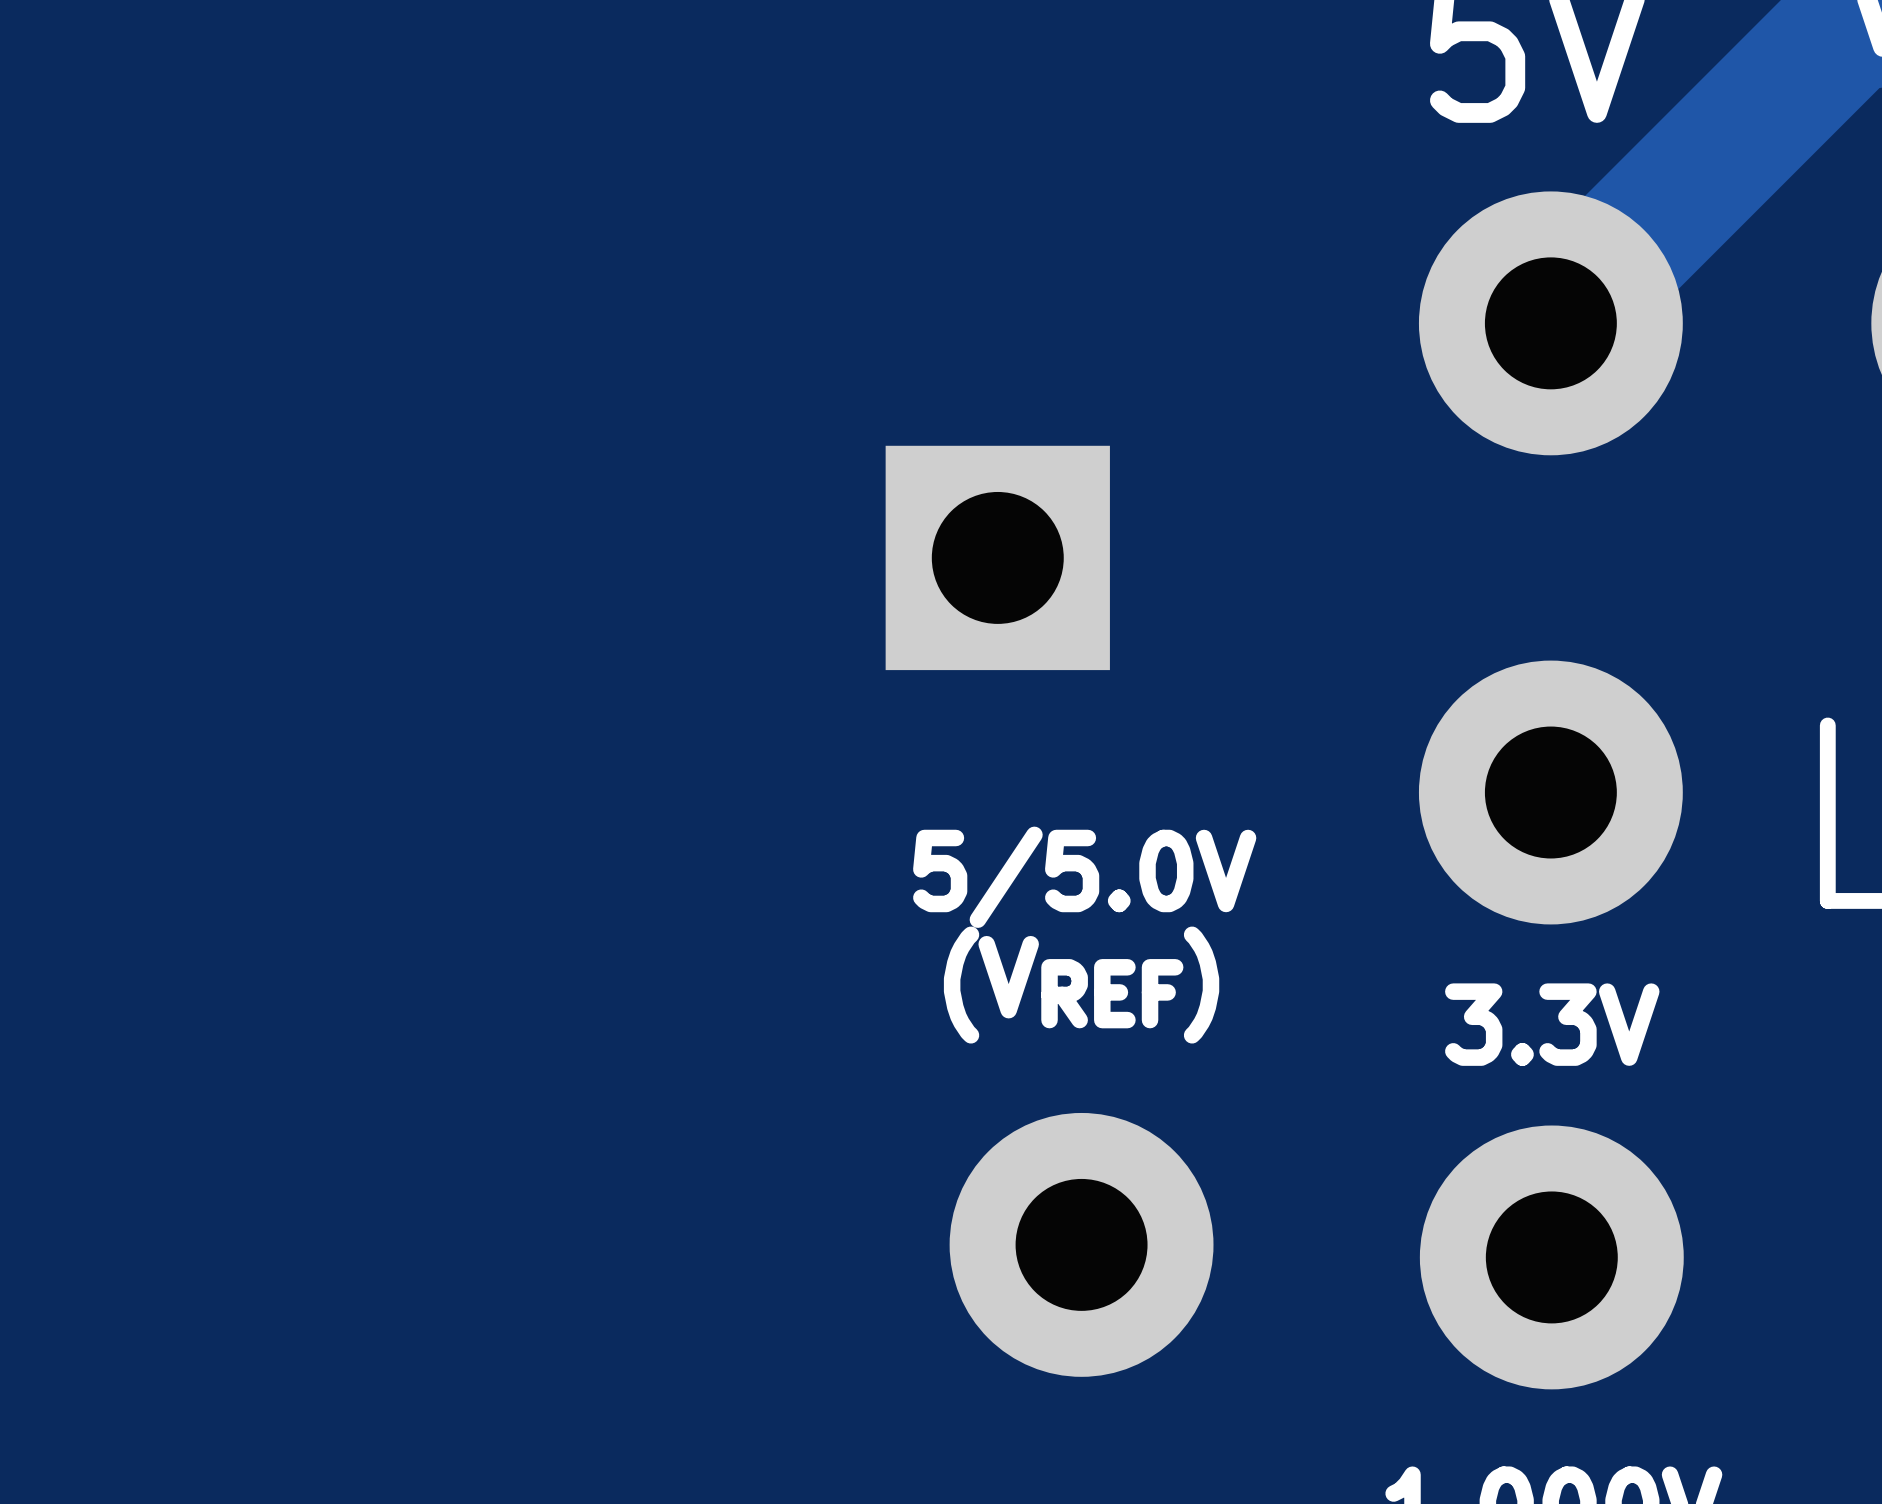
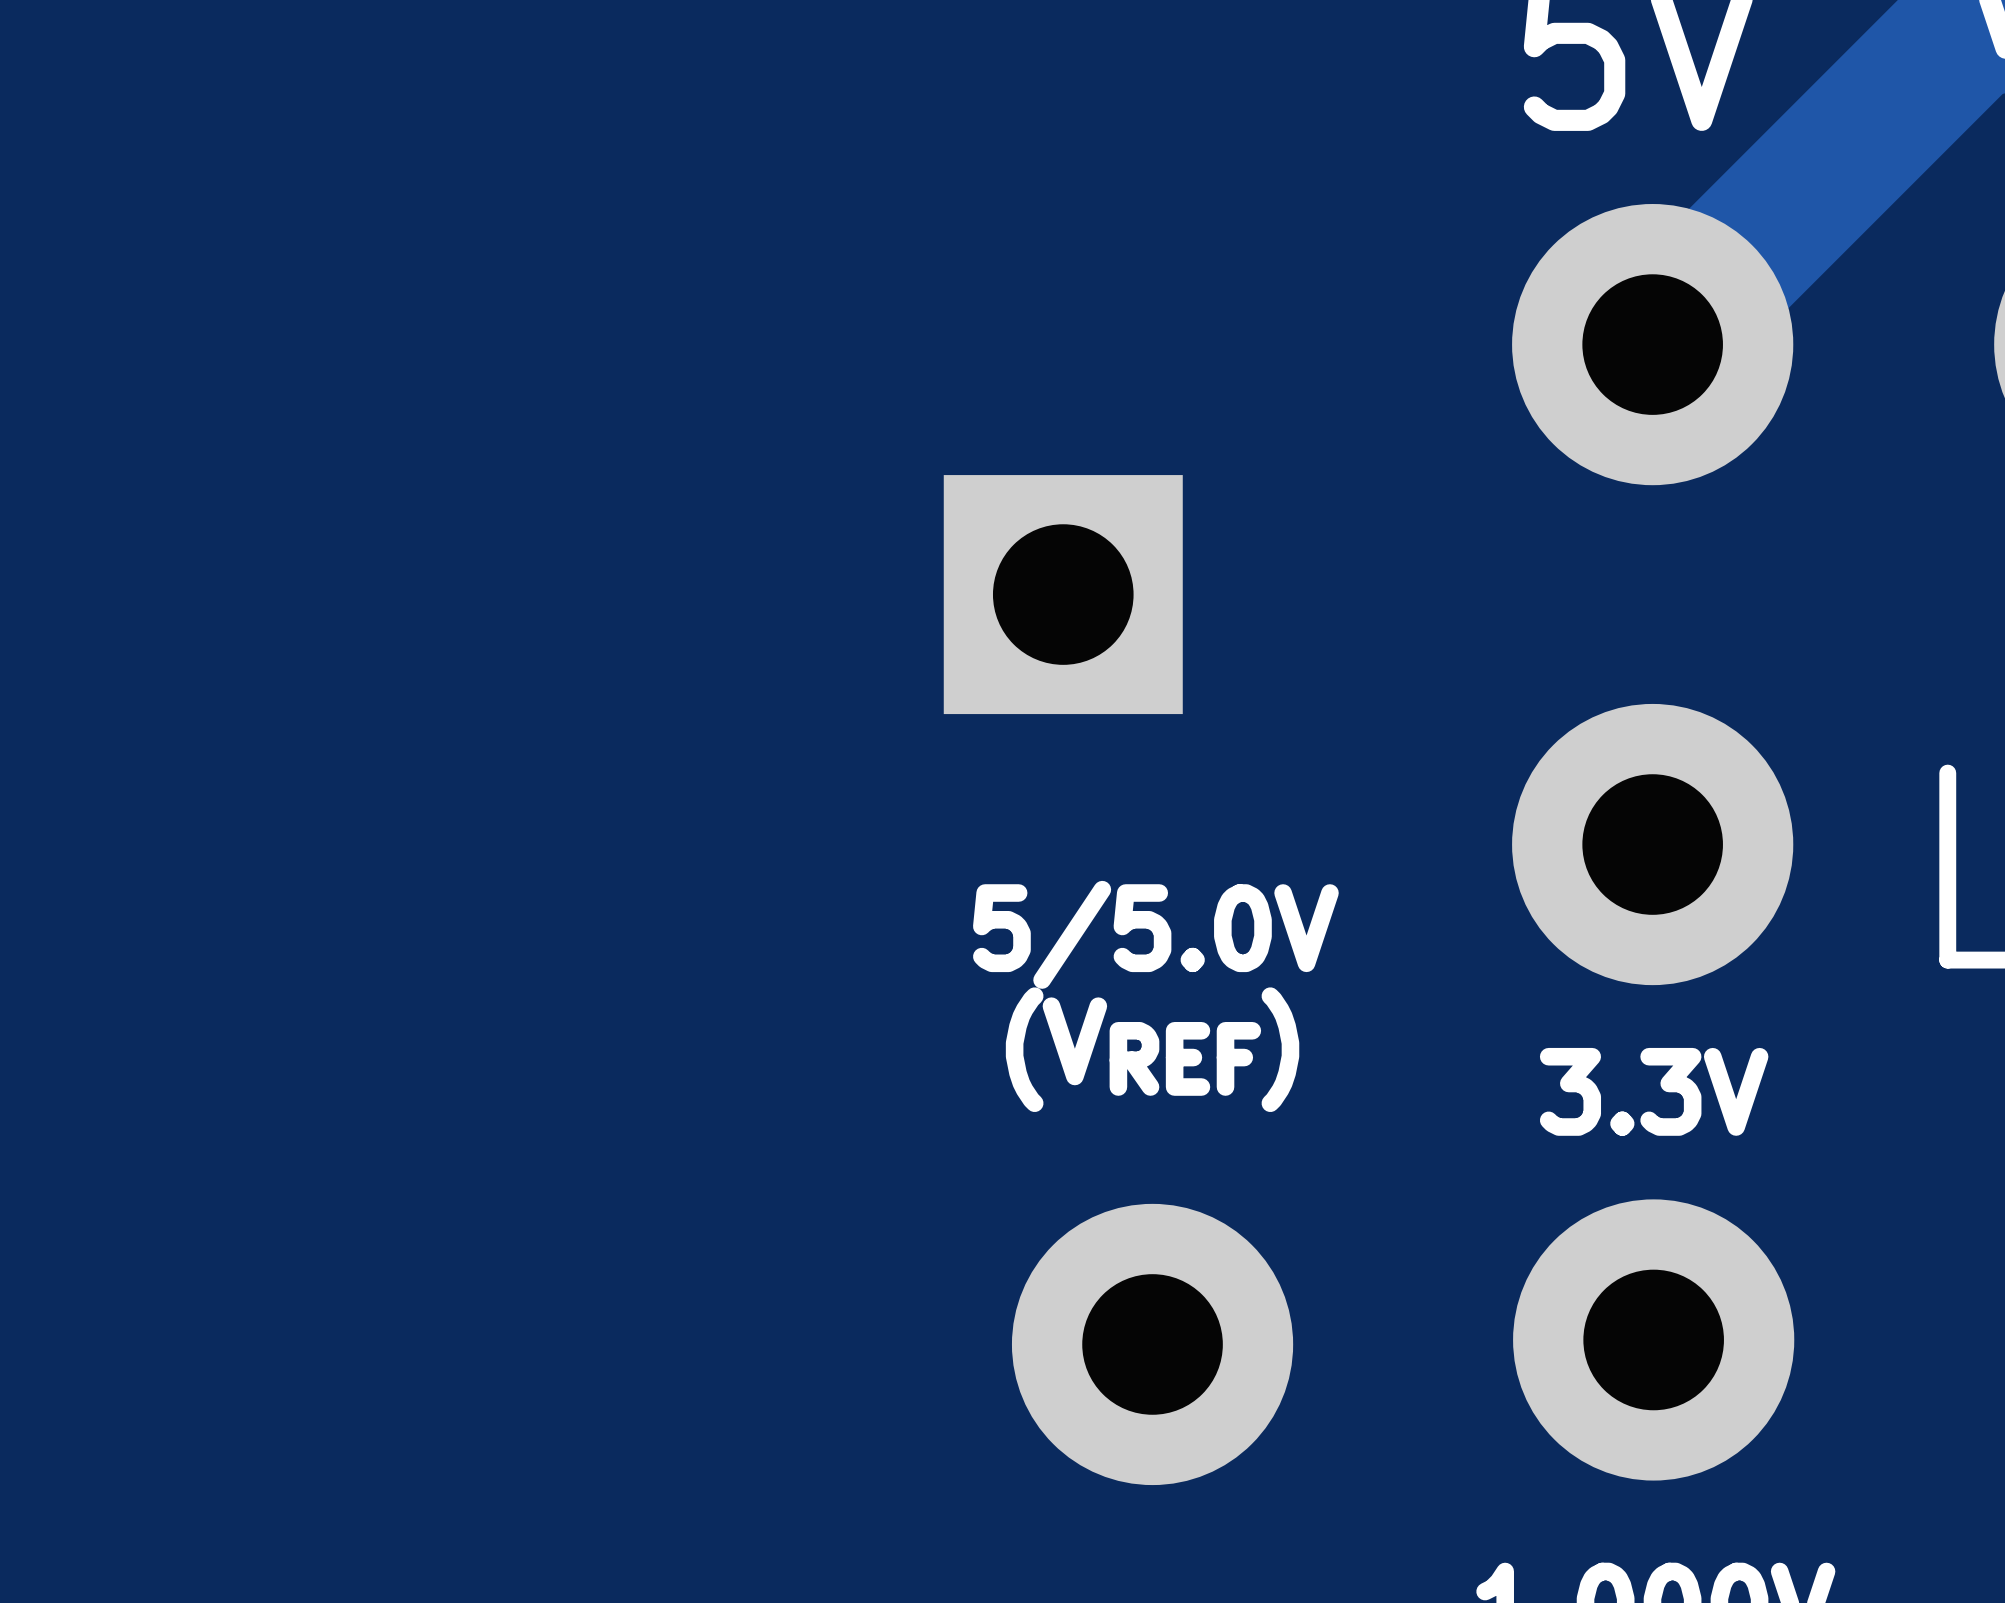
part position: (1081, 1244) -> (1152, 1344)

